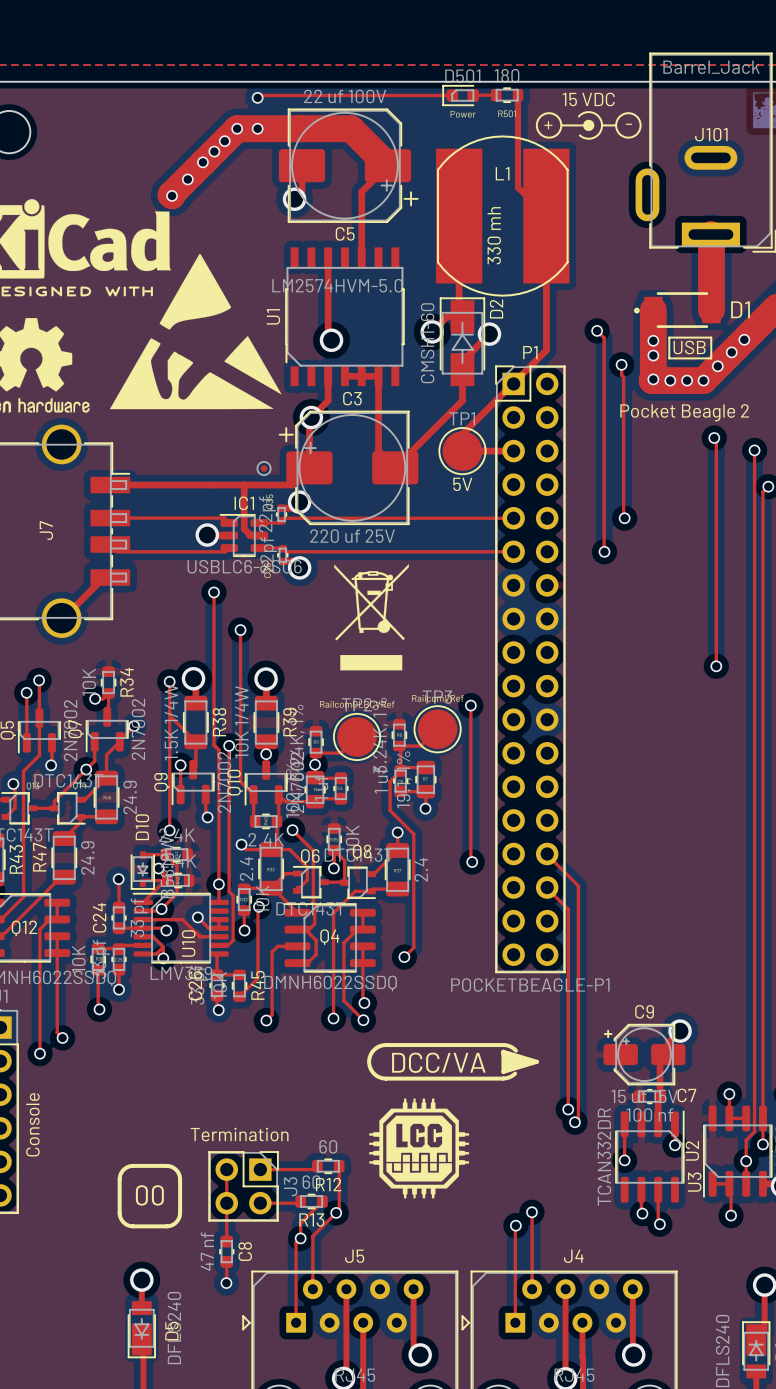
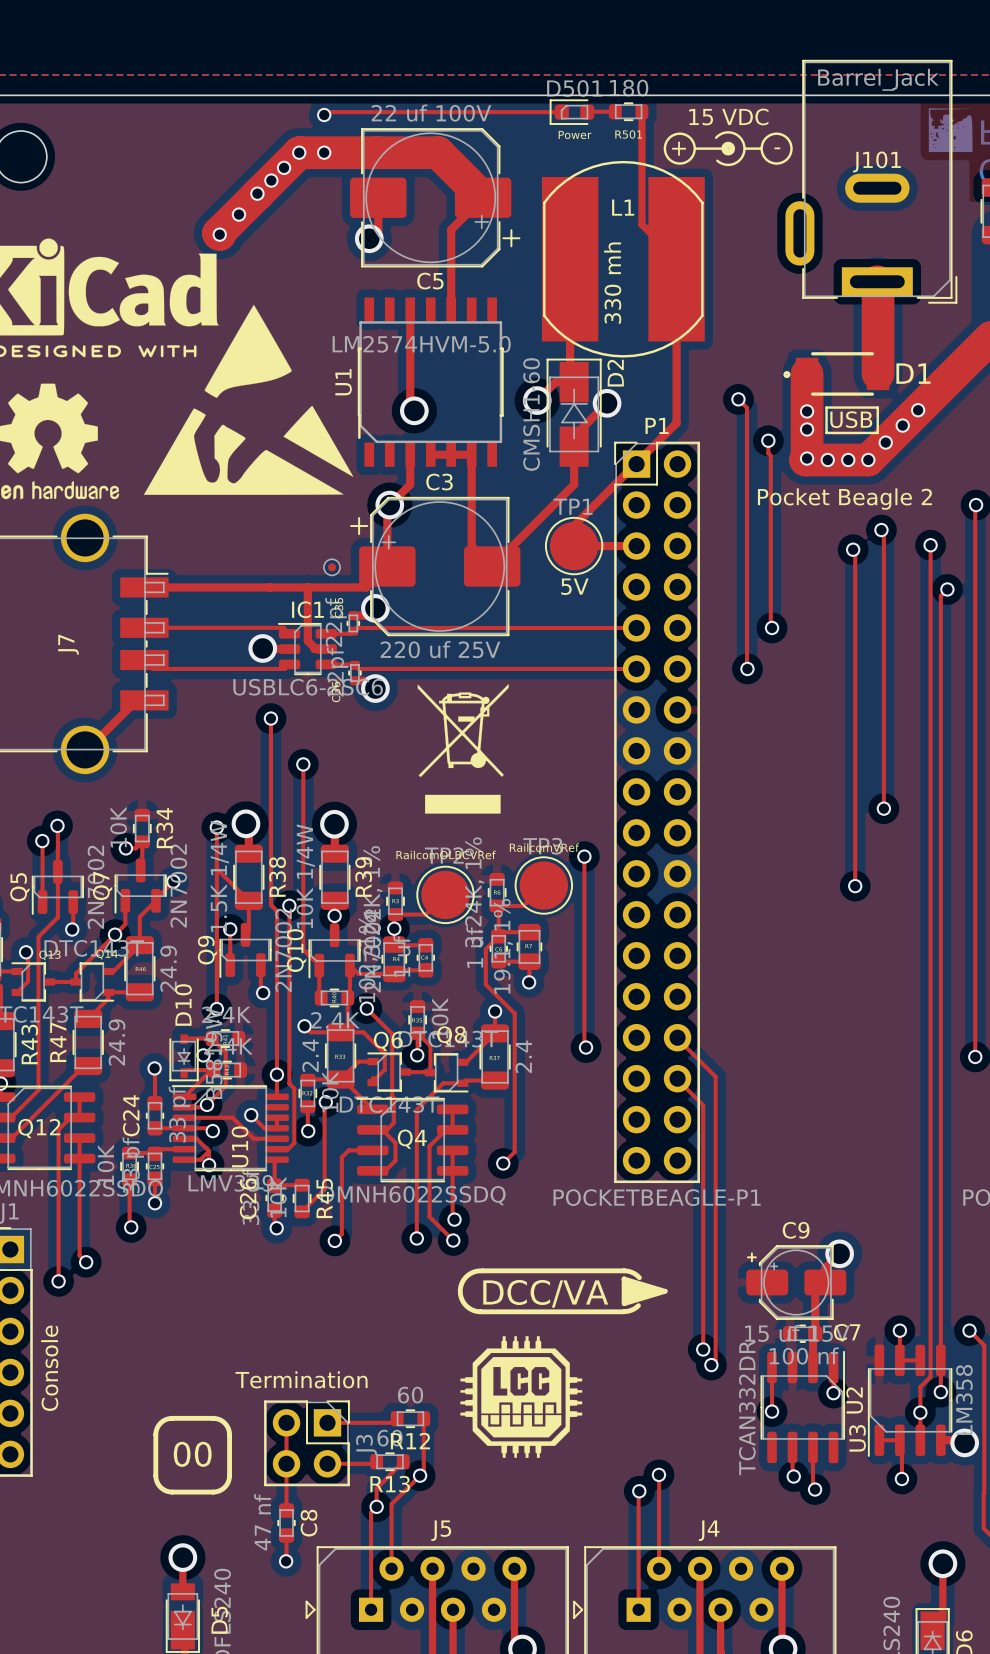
top track: none -> (853, 549) (855, 551) (855, 886)
via: none -> (853, 549)
via: none -> (855, 886)

